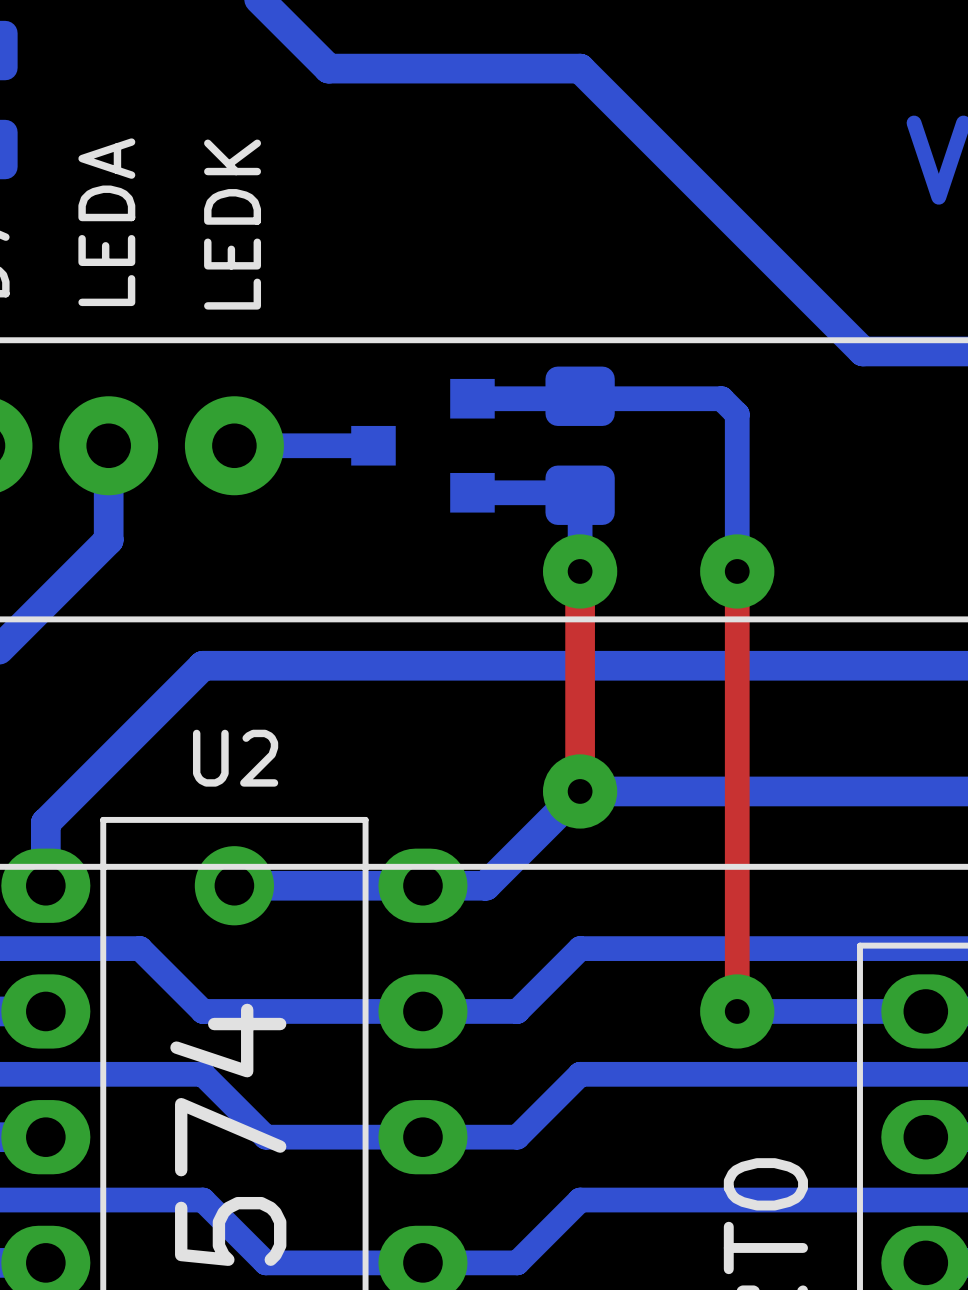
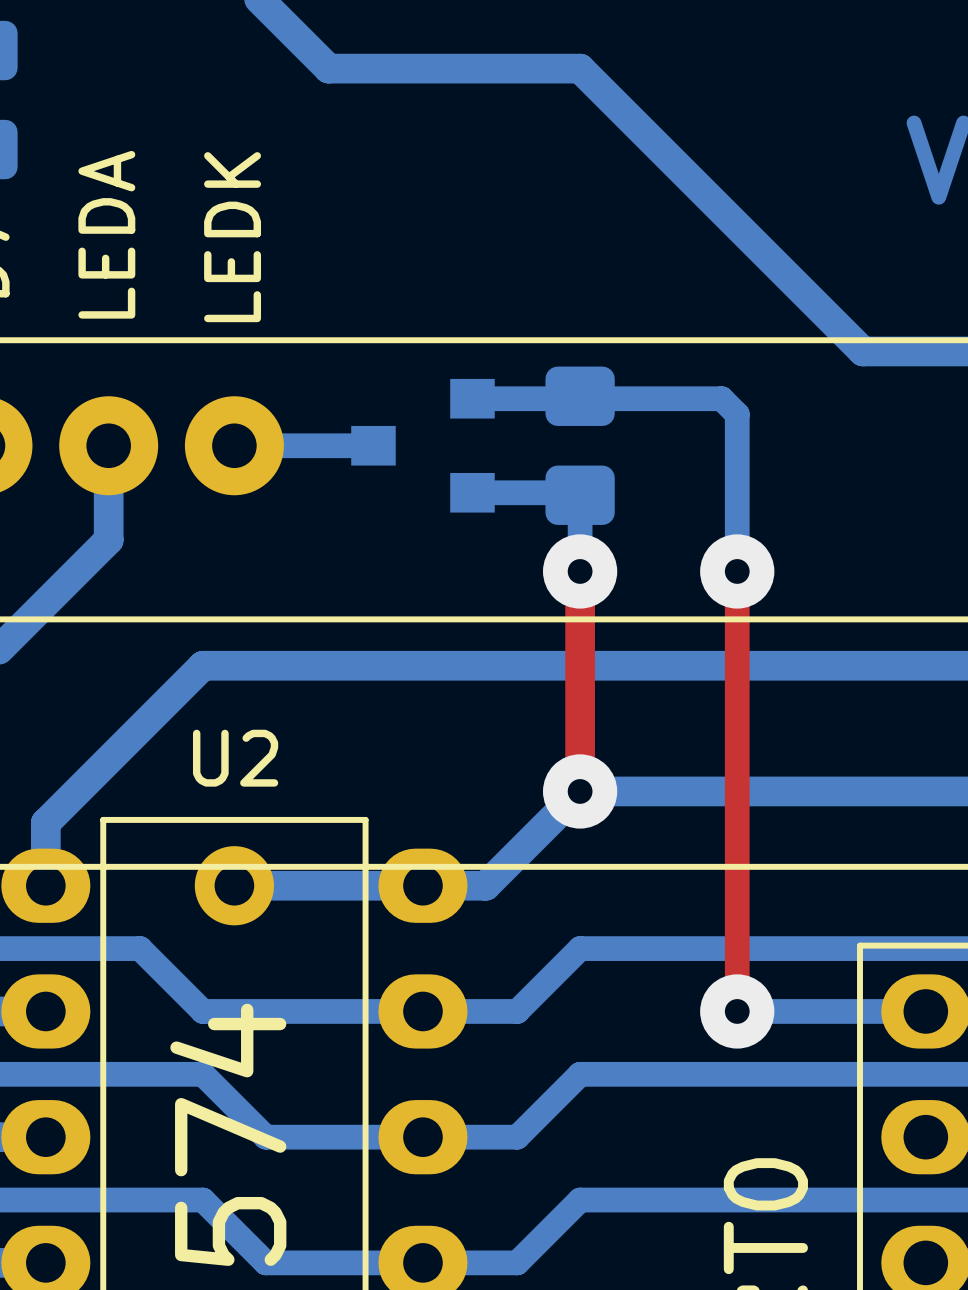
text position: LEDA (106, 222) -> LEDA (106, 234)
text position: LEDK (232, 224) -> LEDK (232, 237)

